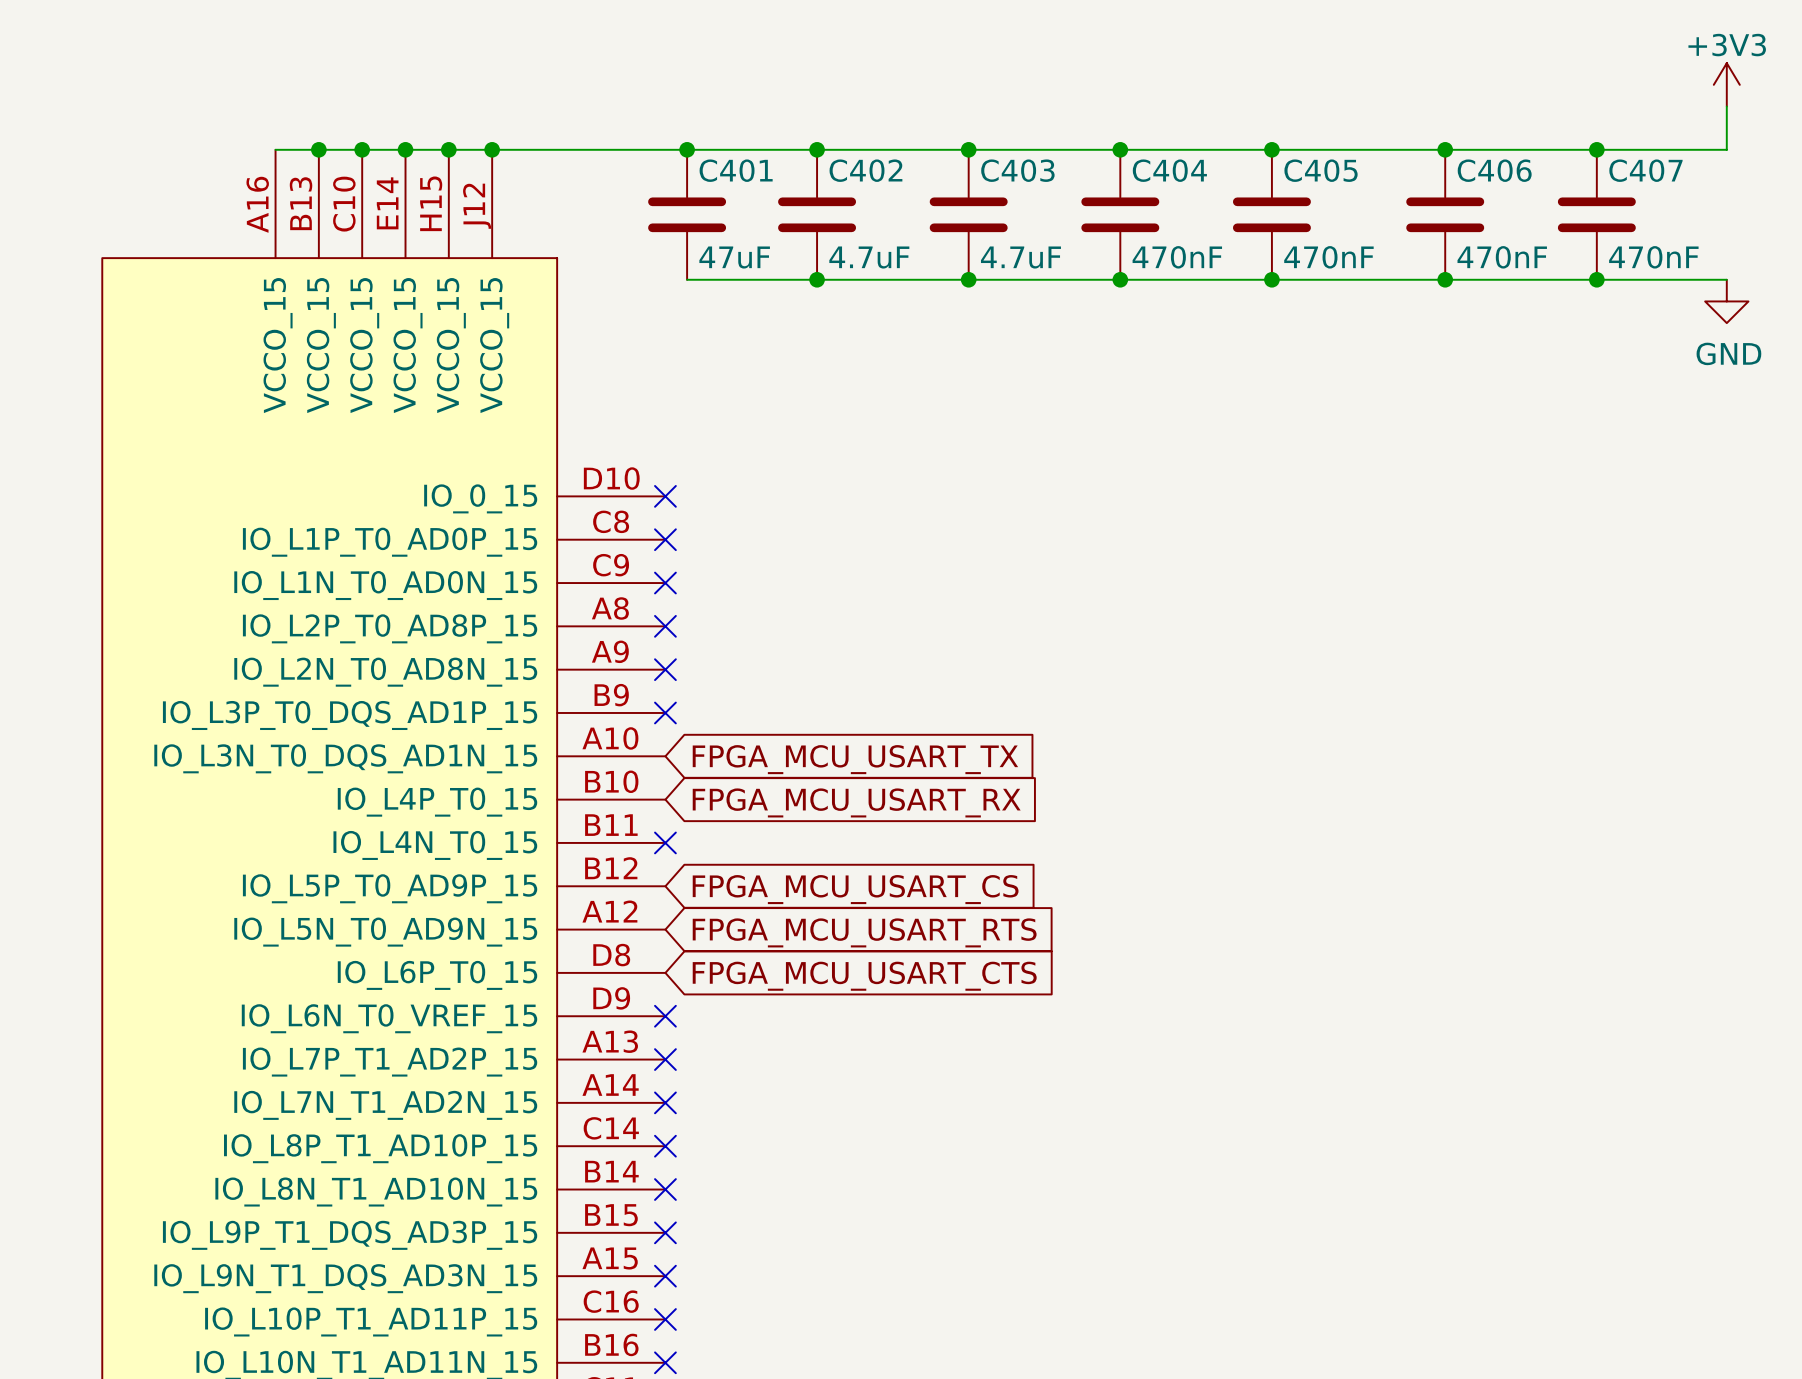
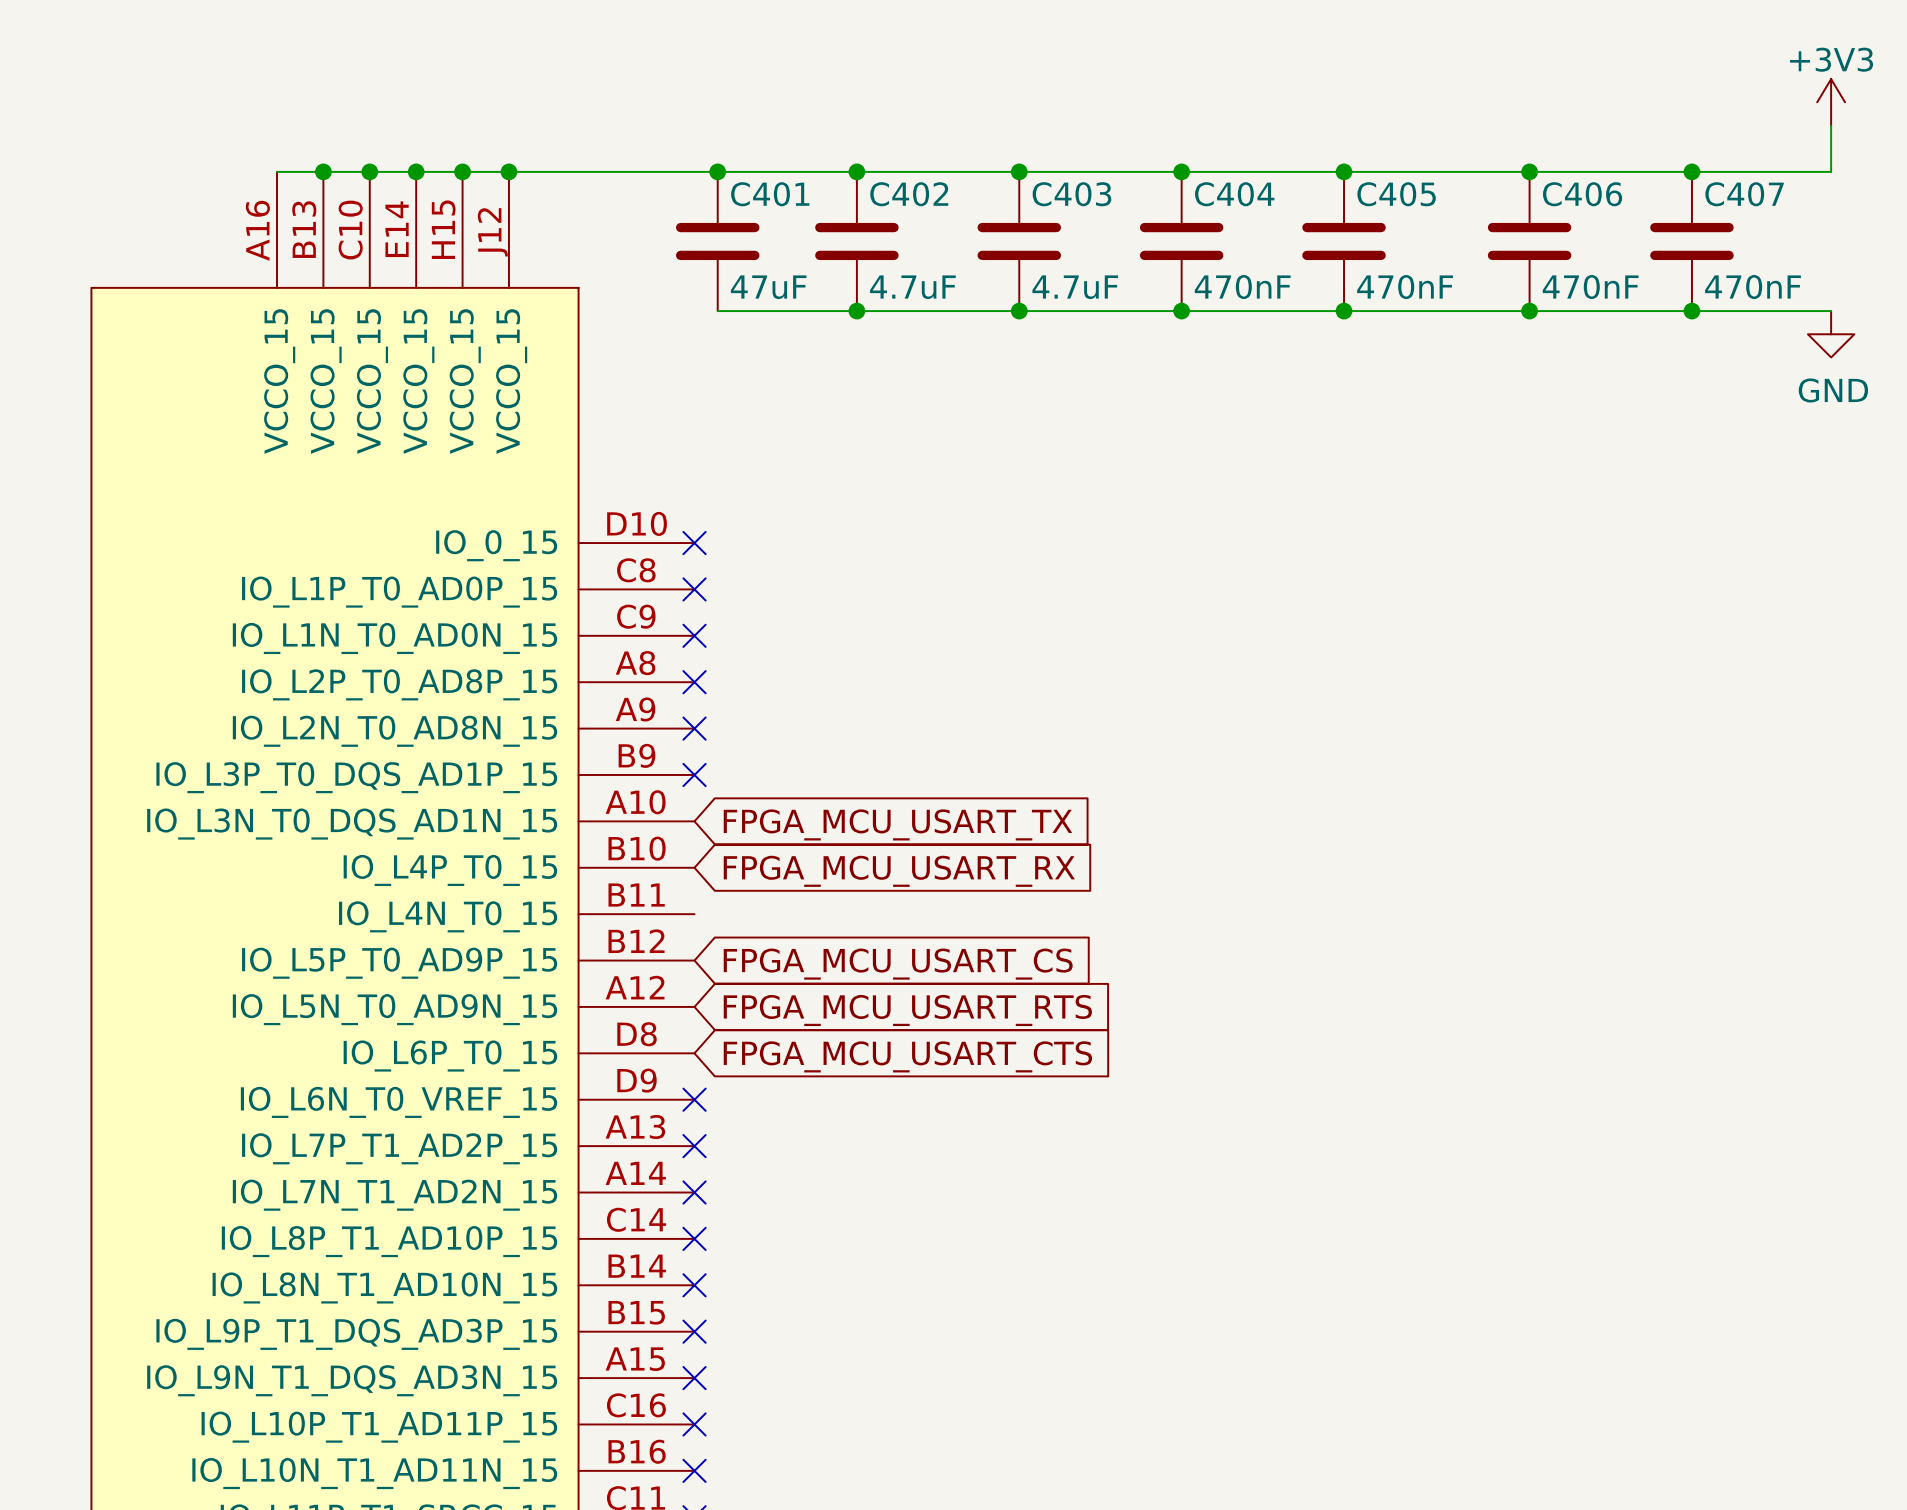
no-connect mark: (665, 842) -> none

